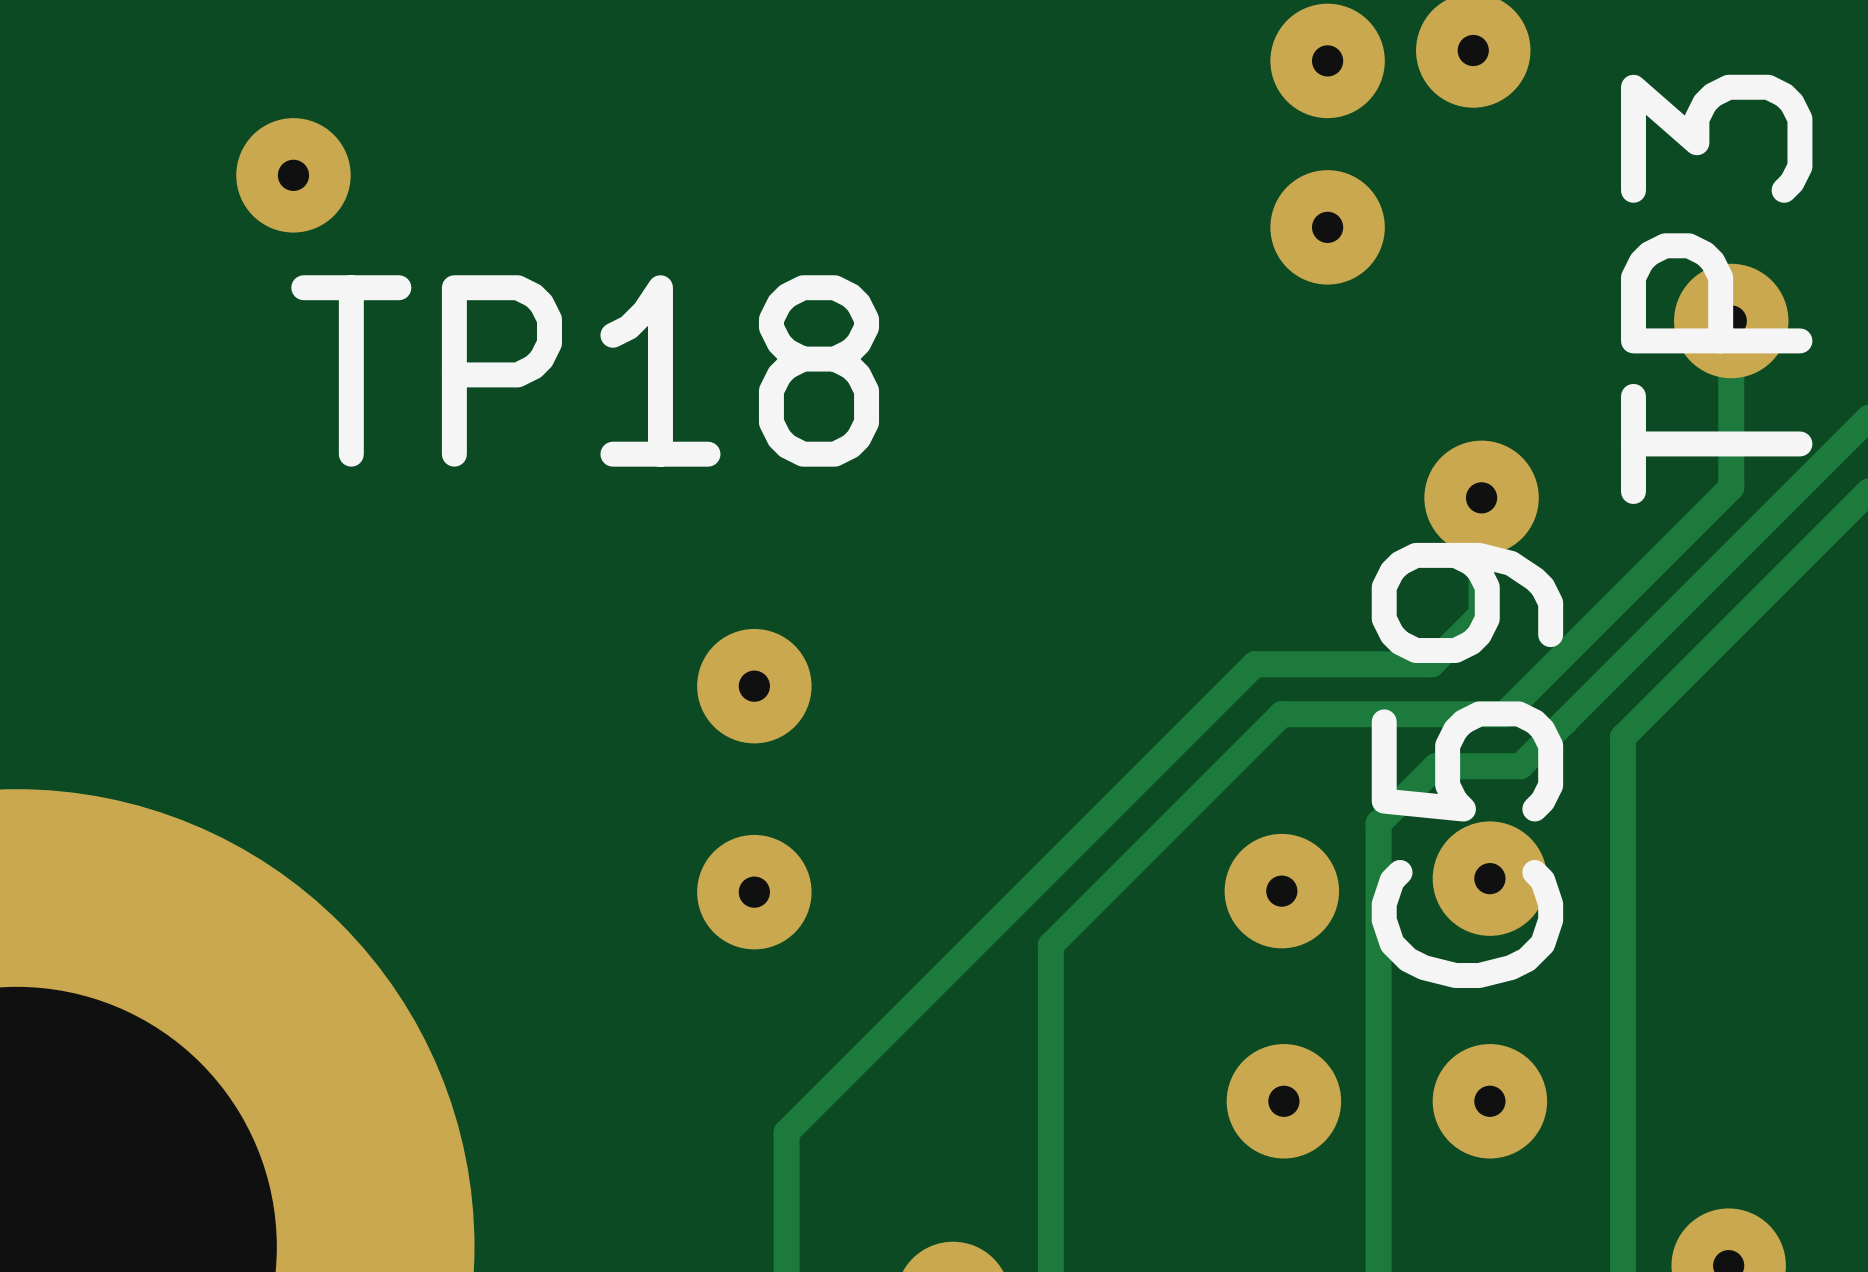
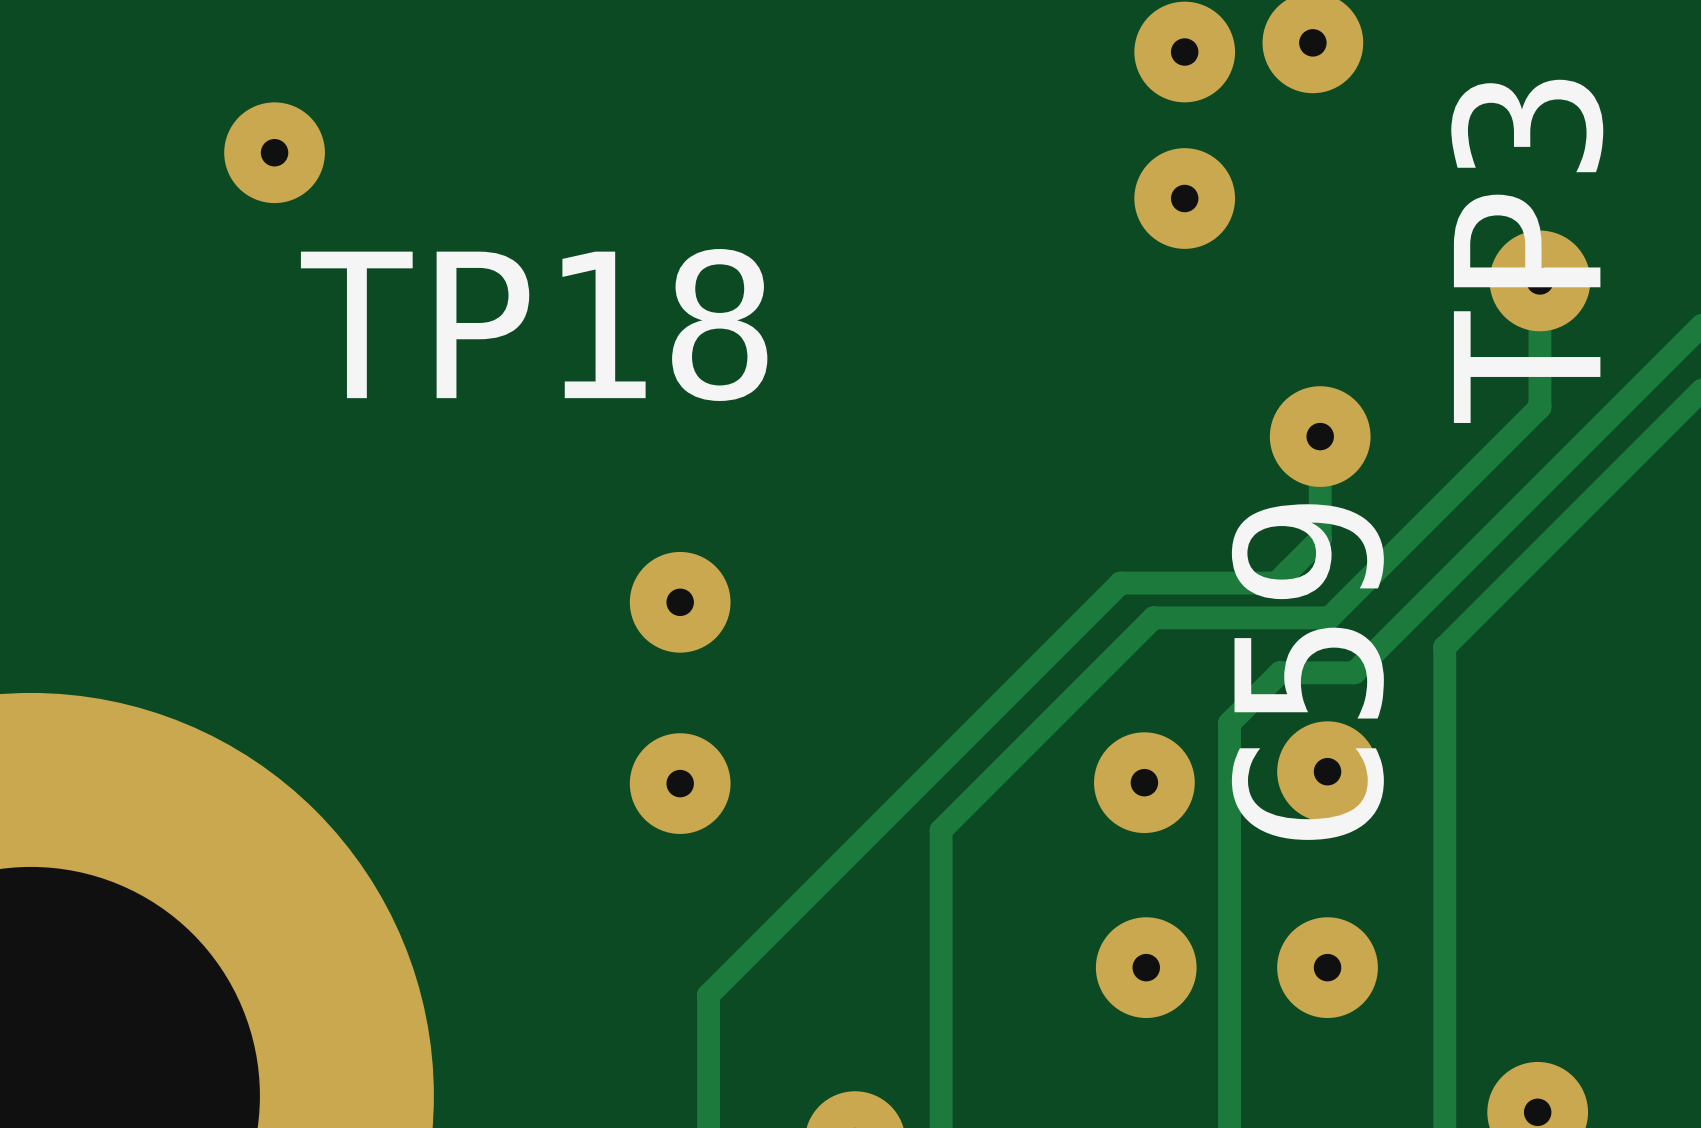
track: (1731, 464) (1731, 487) (1504, 714) (1281, 714) -> (1539, 407) (1329, 617) (1153, 617) (1144, 627)

